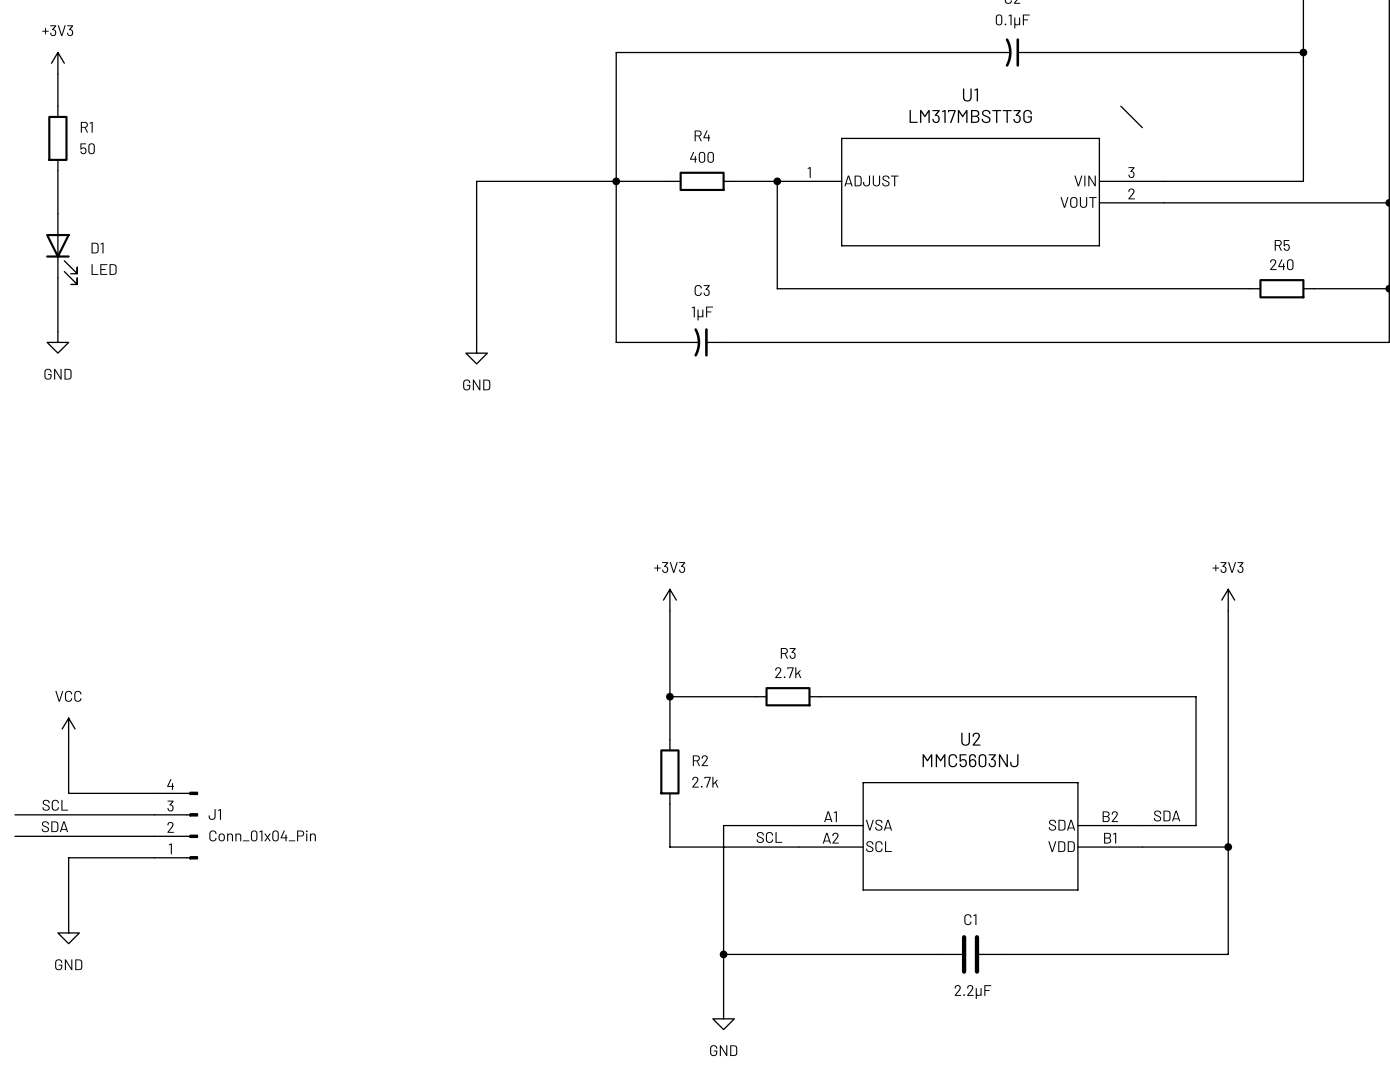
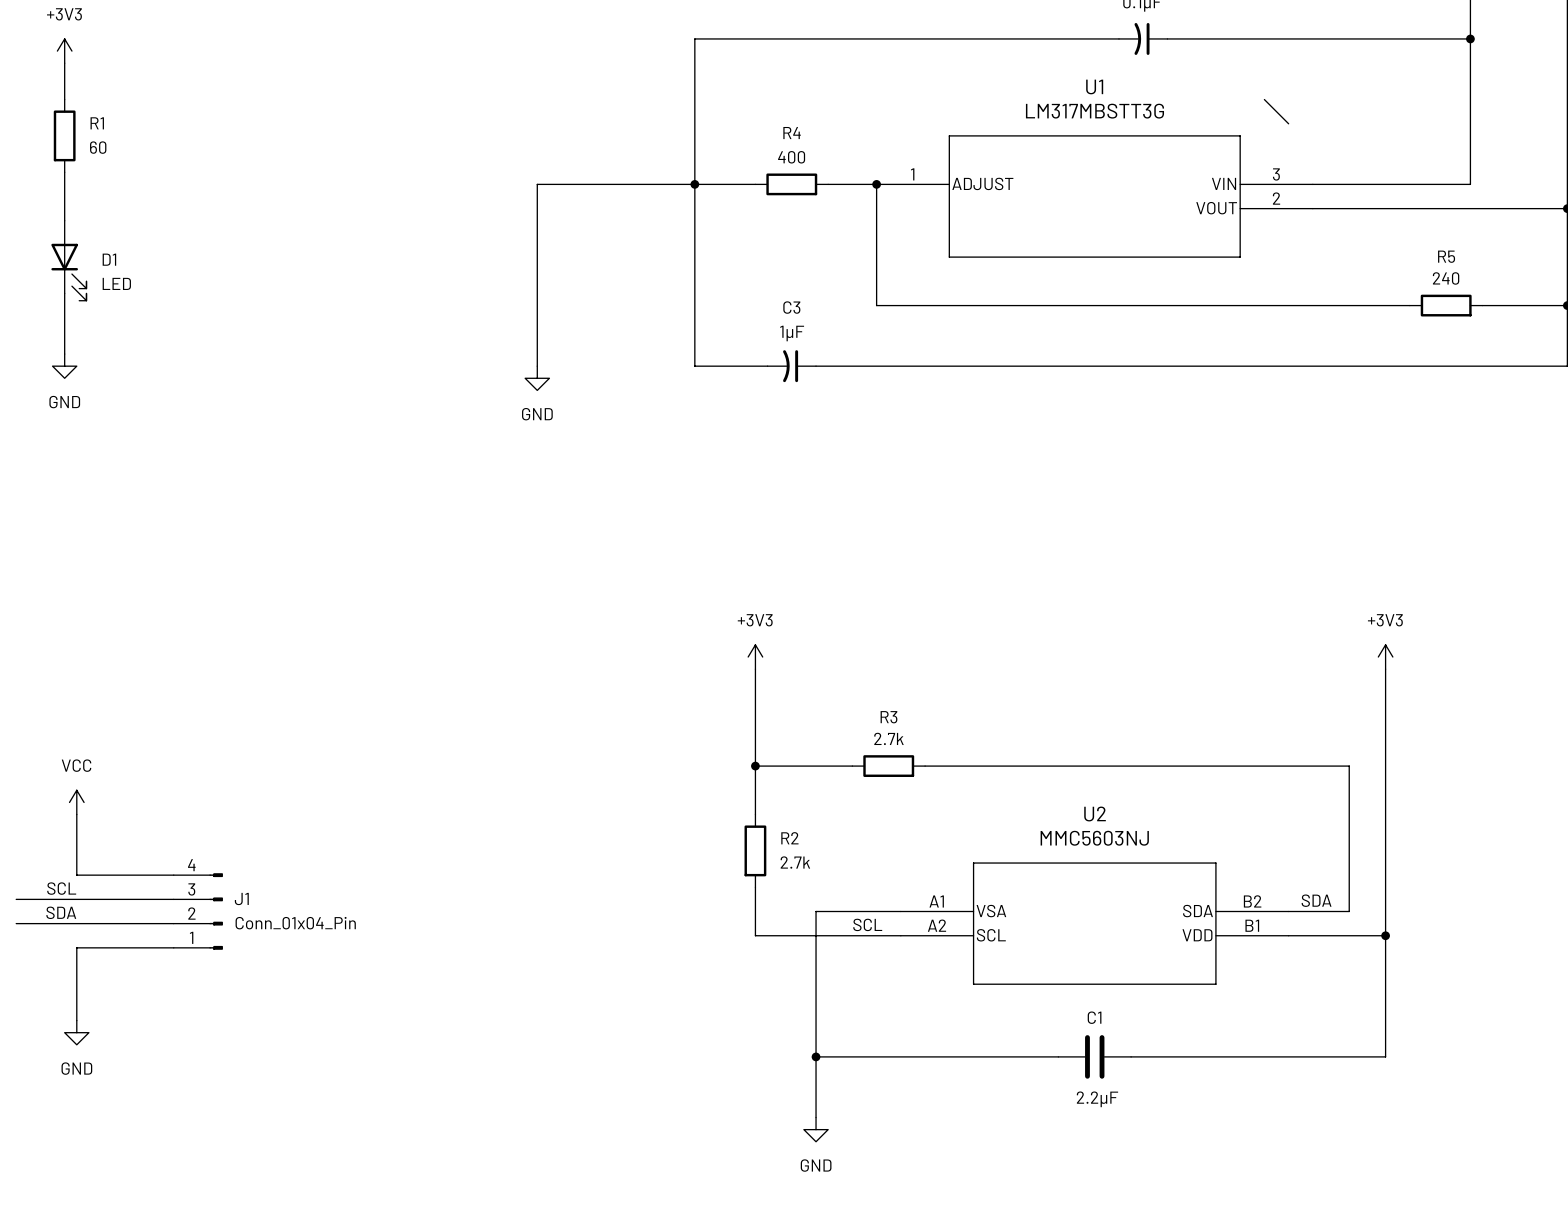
R1 value: 50 (87, 148) -> 60 (98, 147)

